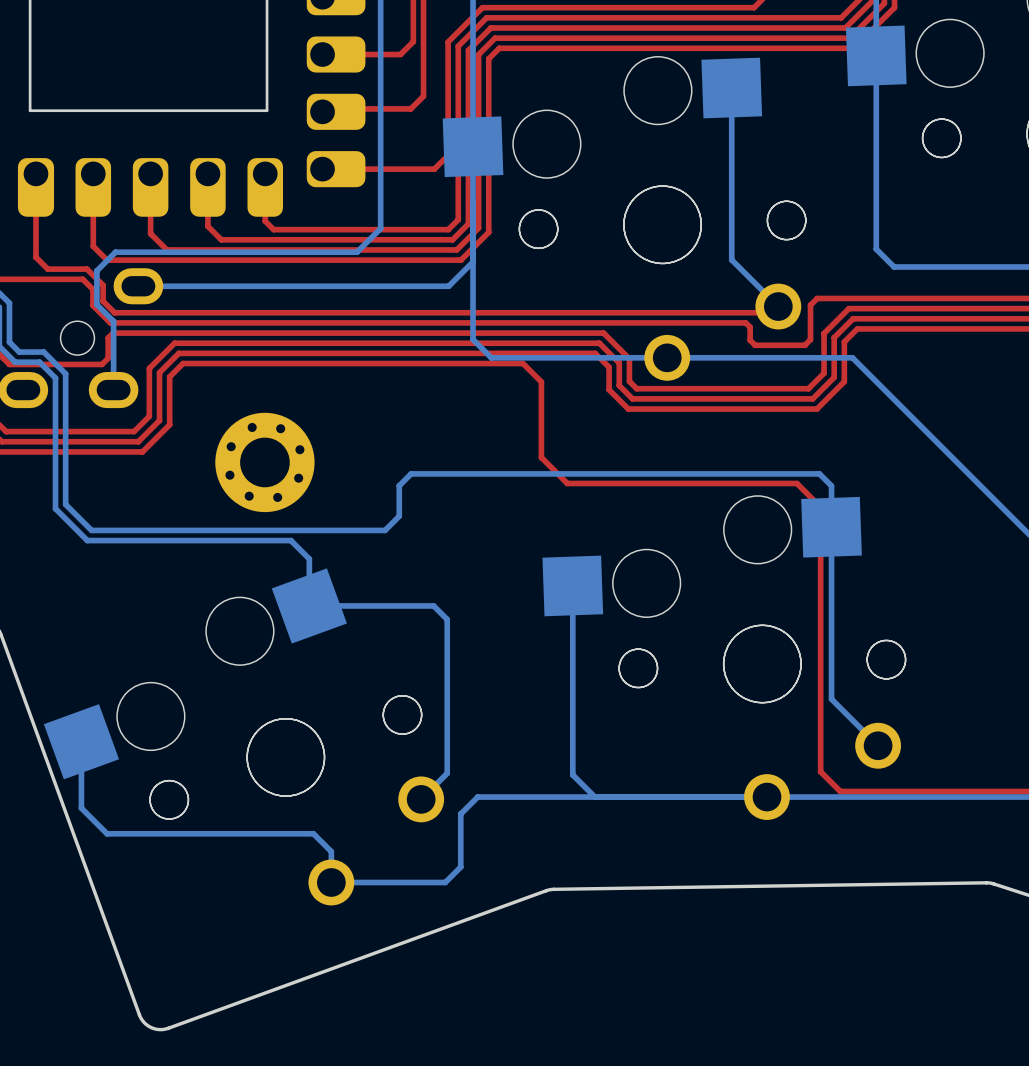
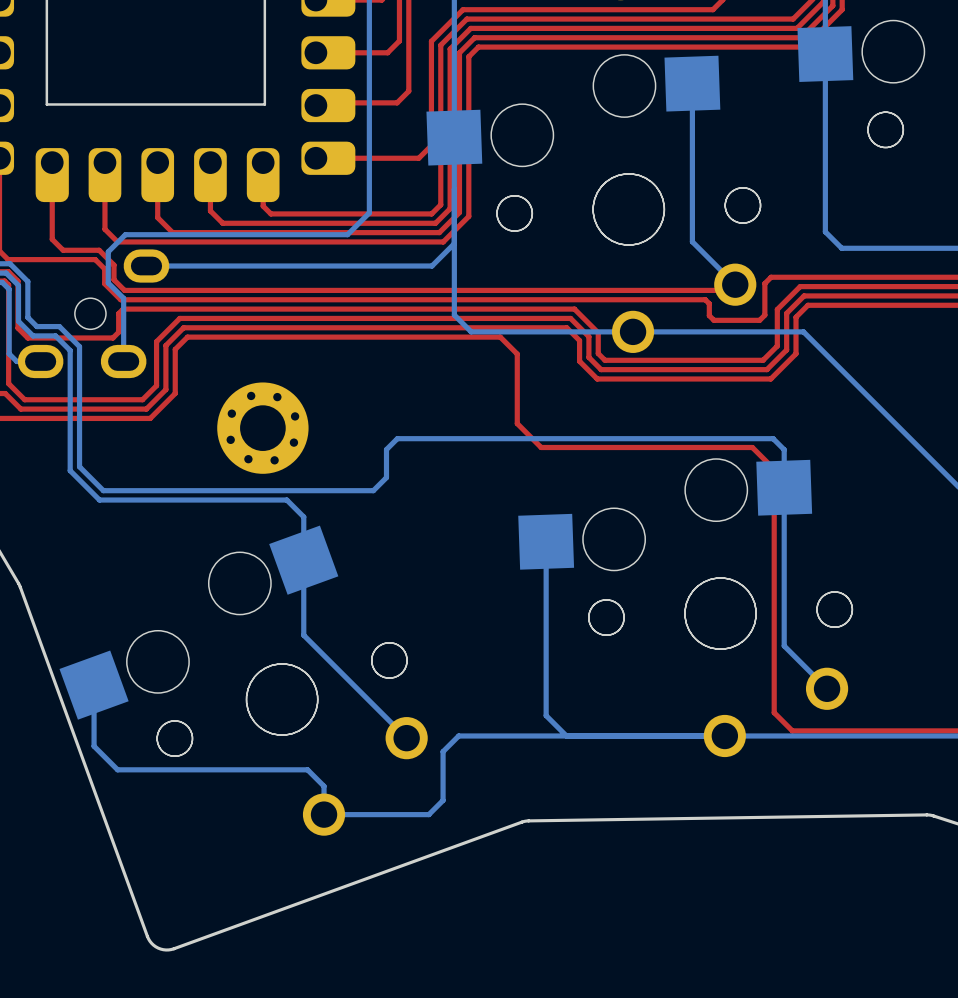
bottom track: (309, 605) (433, 605) (447, 619) (447, 773) (421, 799) -> (303, 560) (303, 635) (406, 738)

